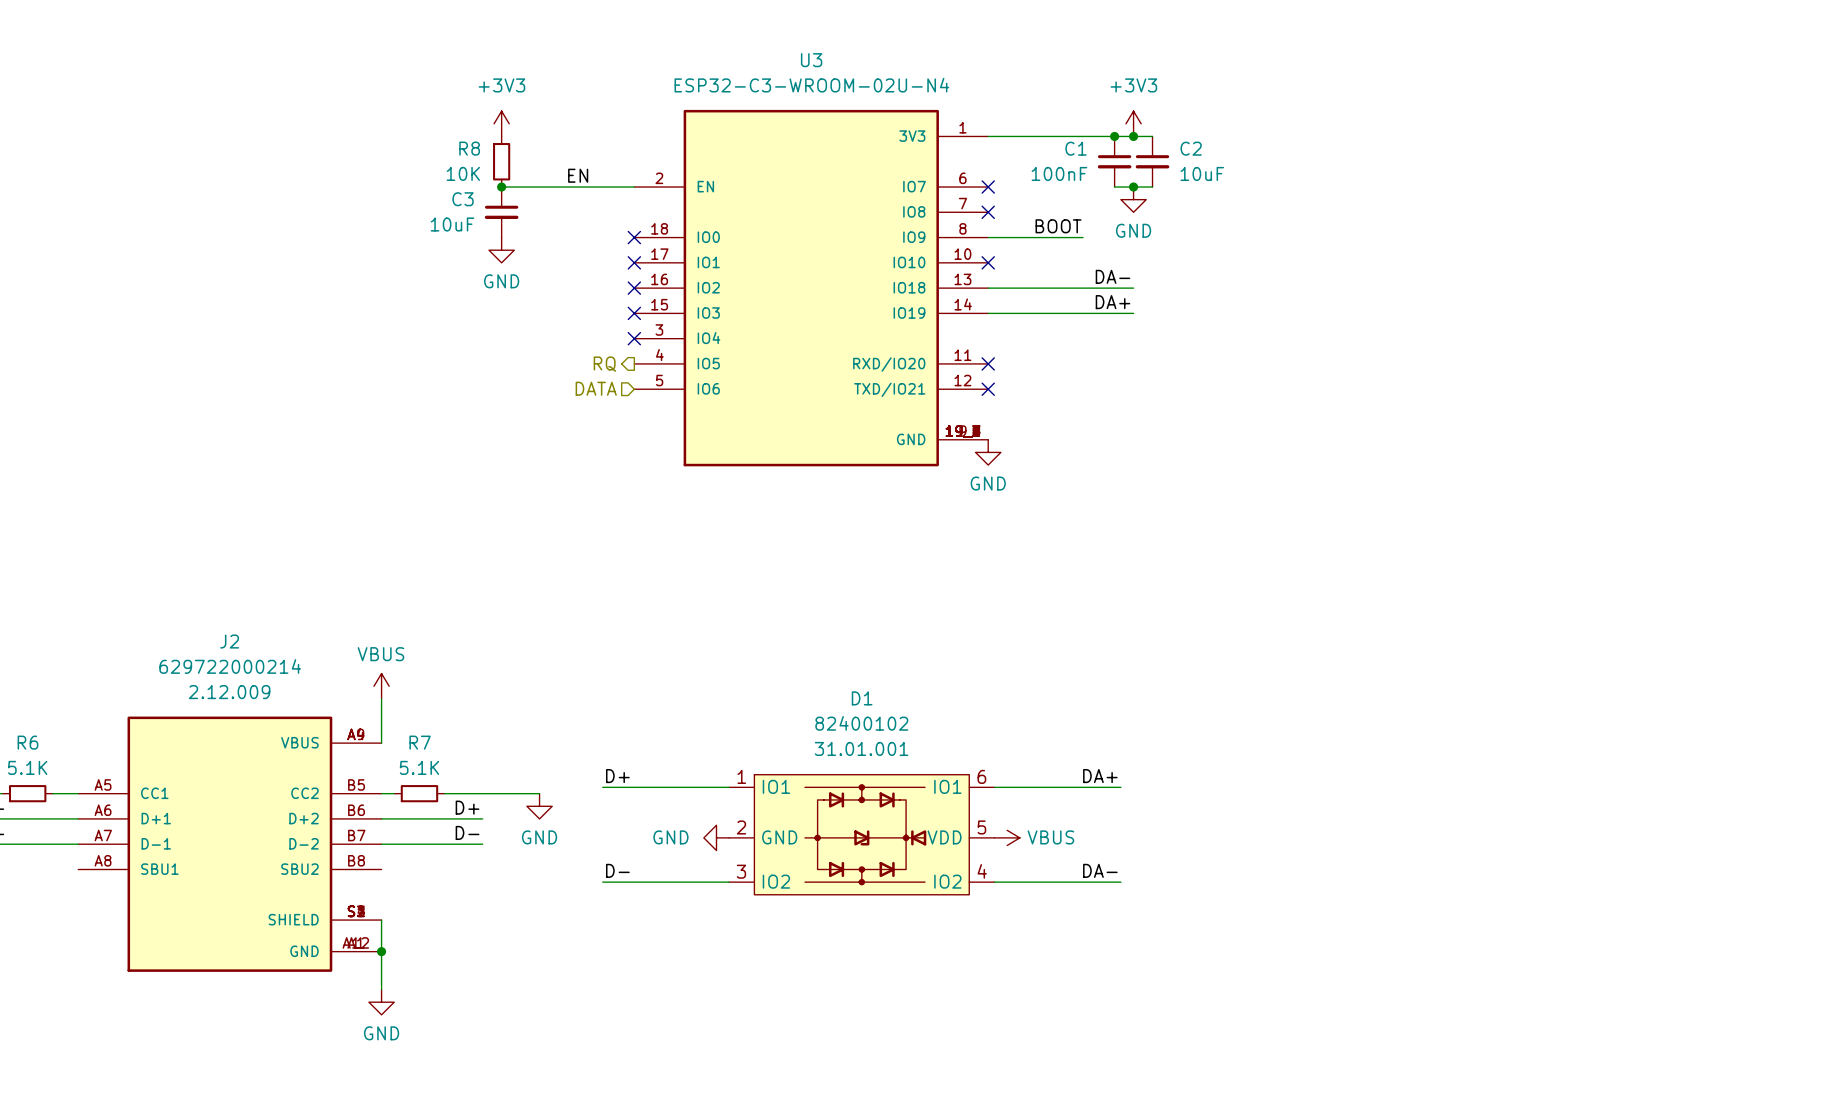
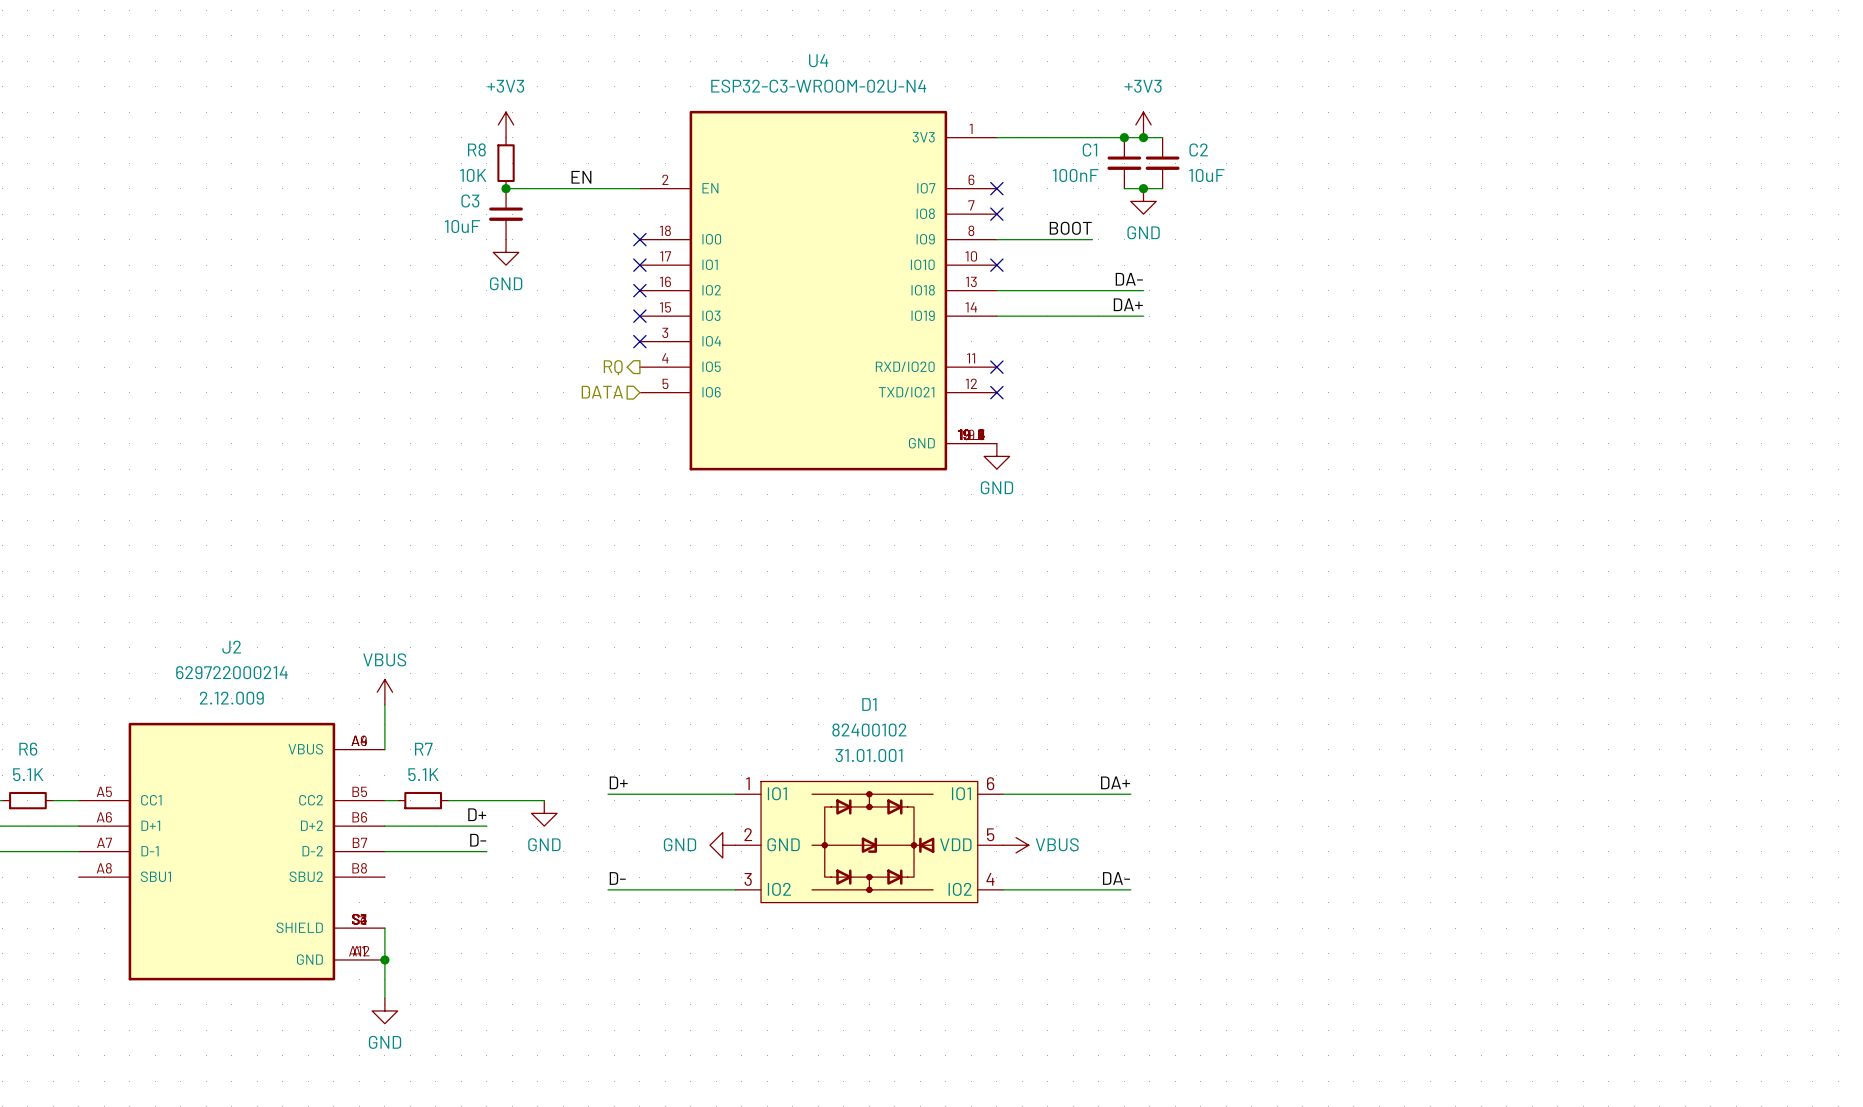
U3 name: U3 (811, 60) -> U4 (818, 60)

